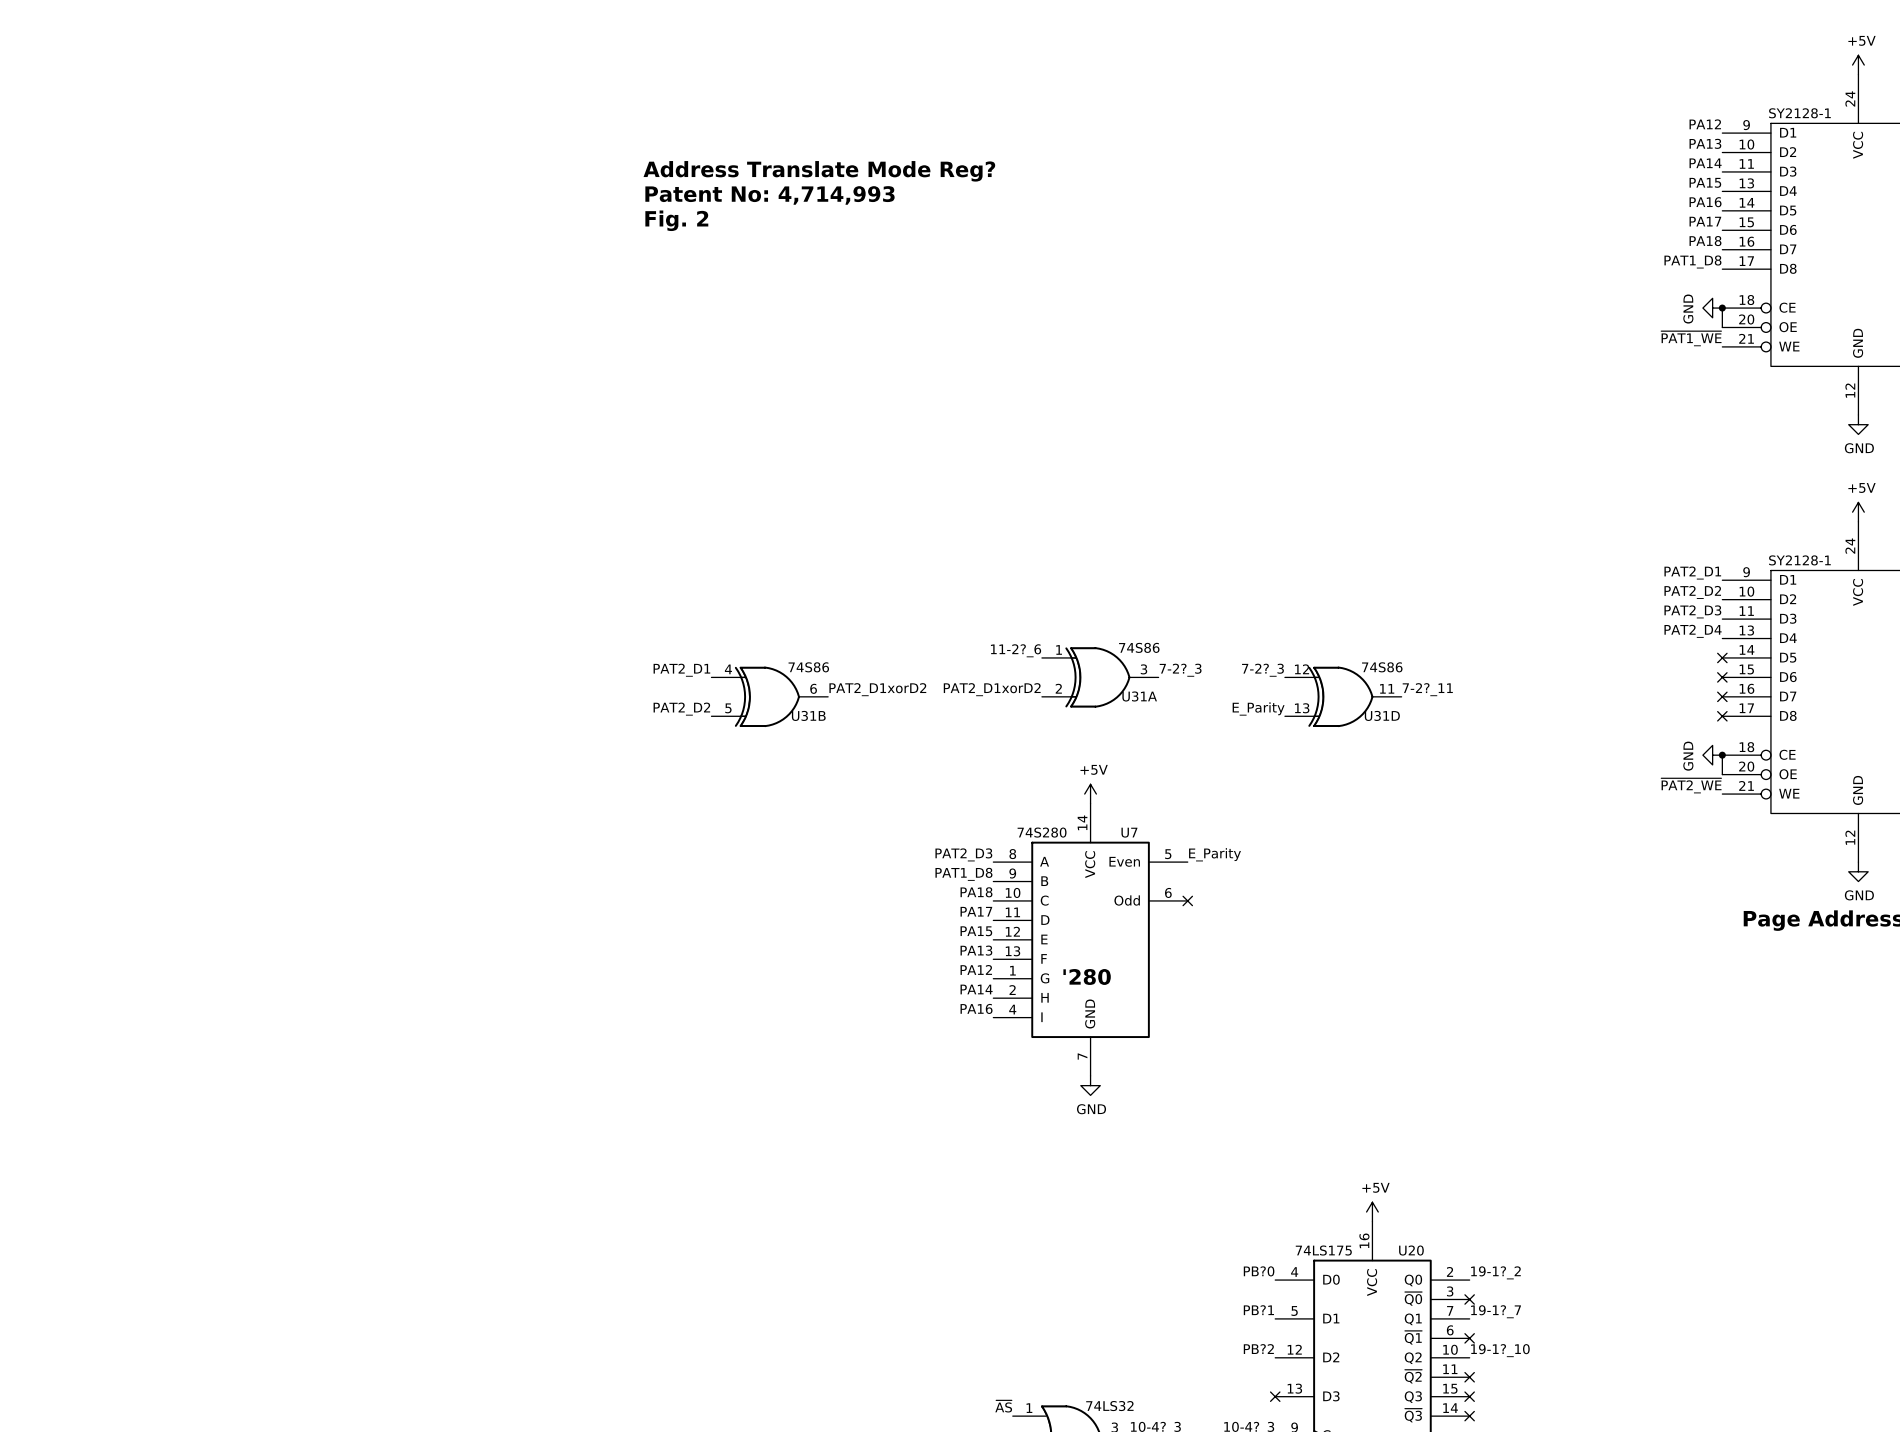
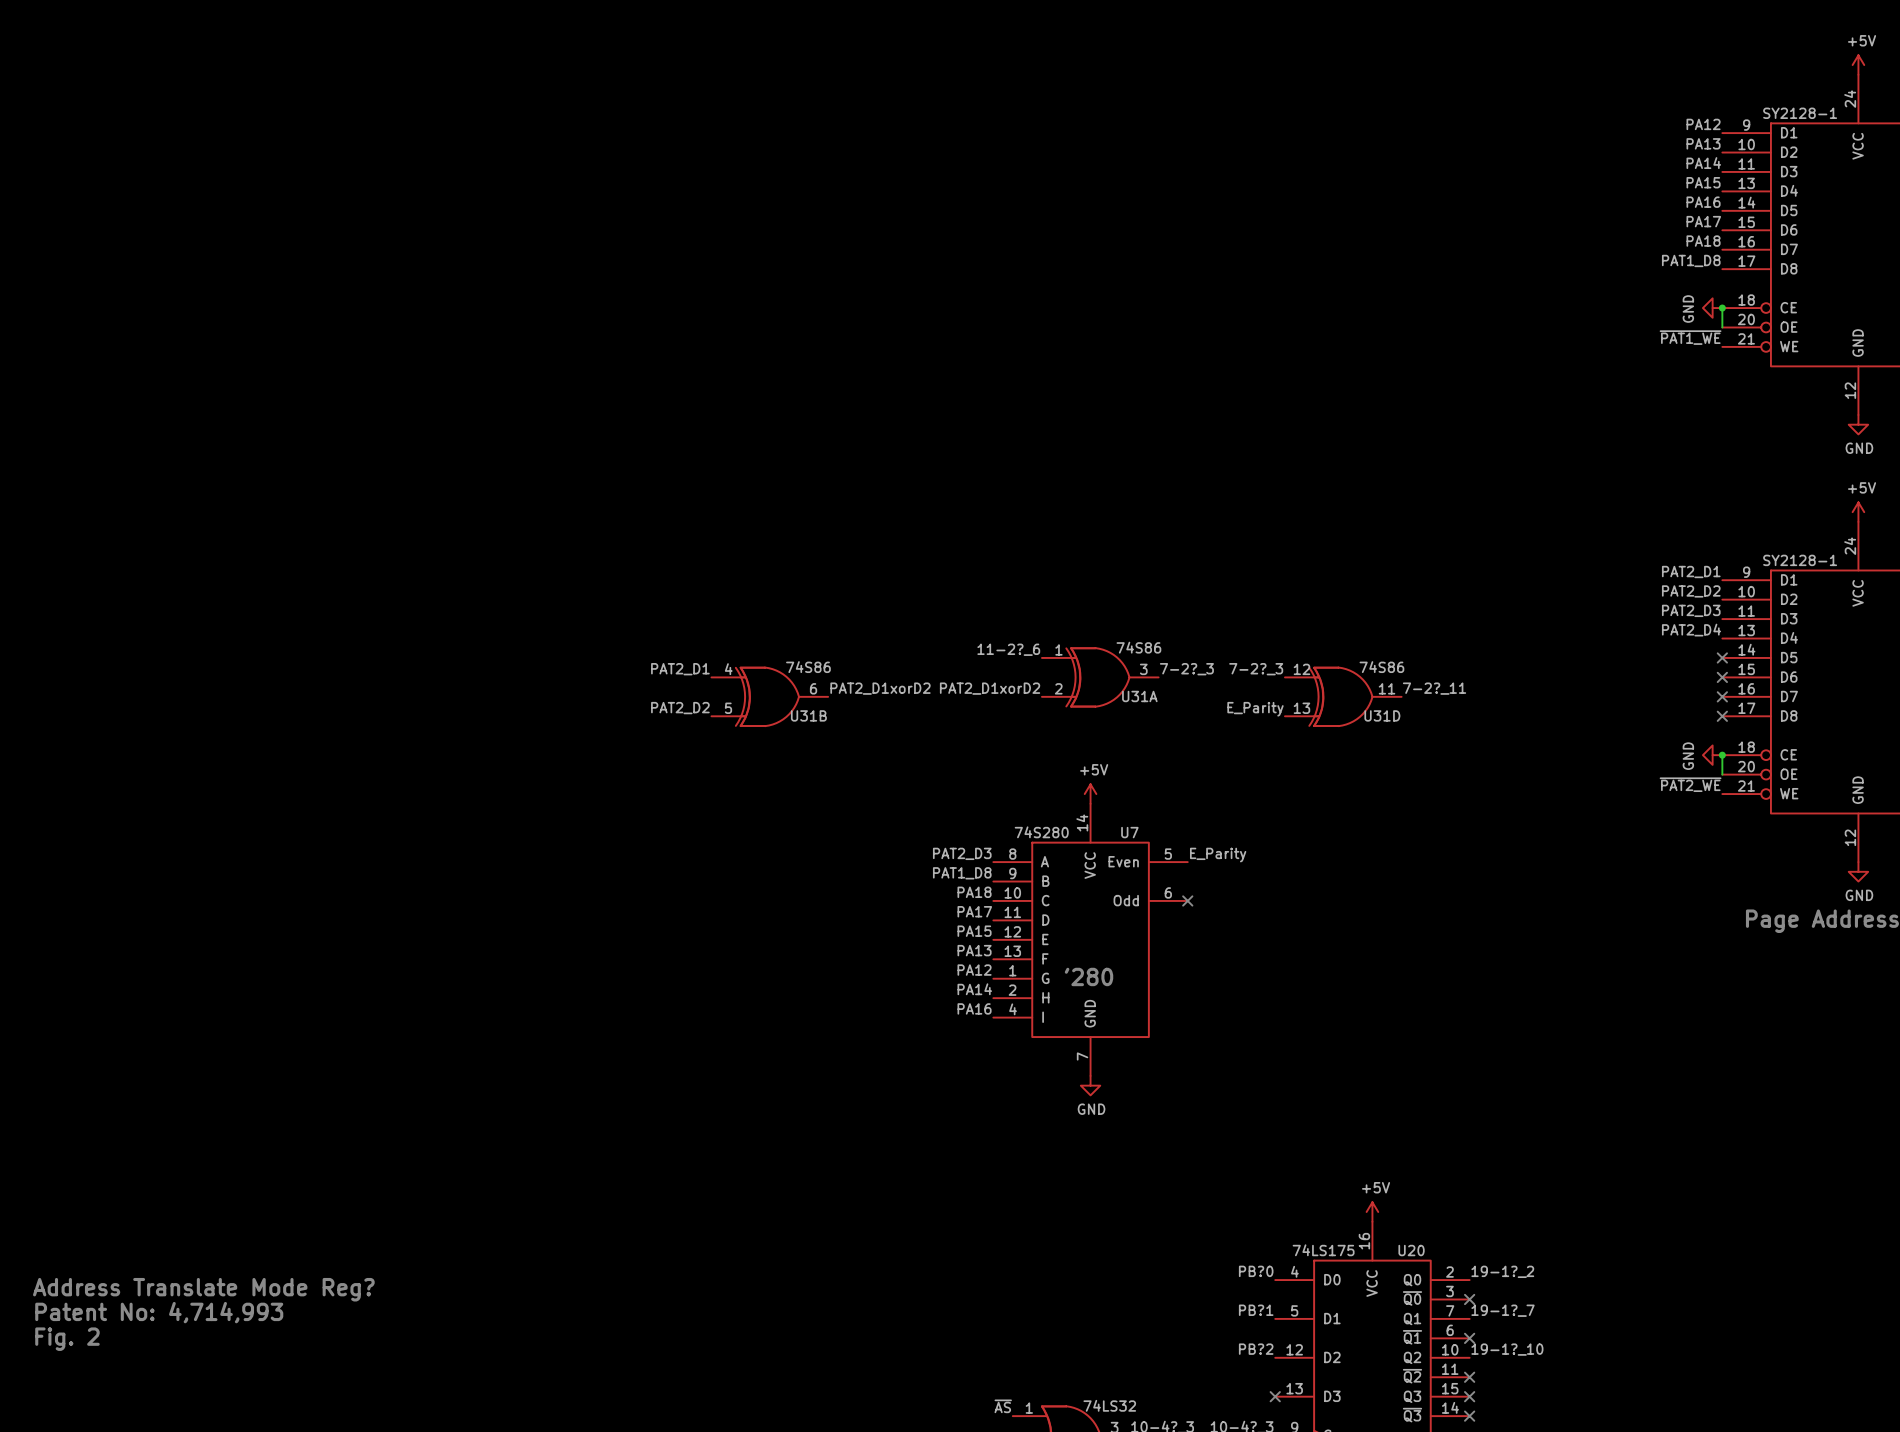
text: Address Translate Mode Reg? (819, 171) -> none
text: Patent No: 4,714,993 (770, 195) -> none
text: Fig. 2 (676, 220) -> none
text: none -> Address Translate Mode Reg? (203, 1289)
text: none -> Patent No: 4,714,993 (159, 1312)
text: none -> Fig. 2 (67, 1339)

